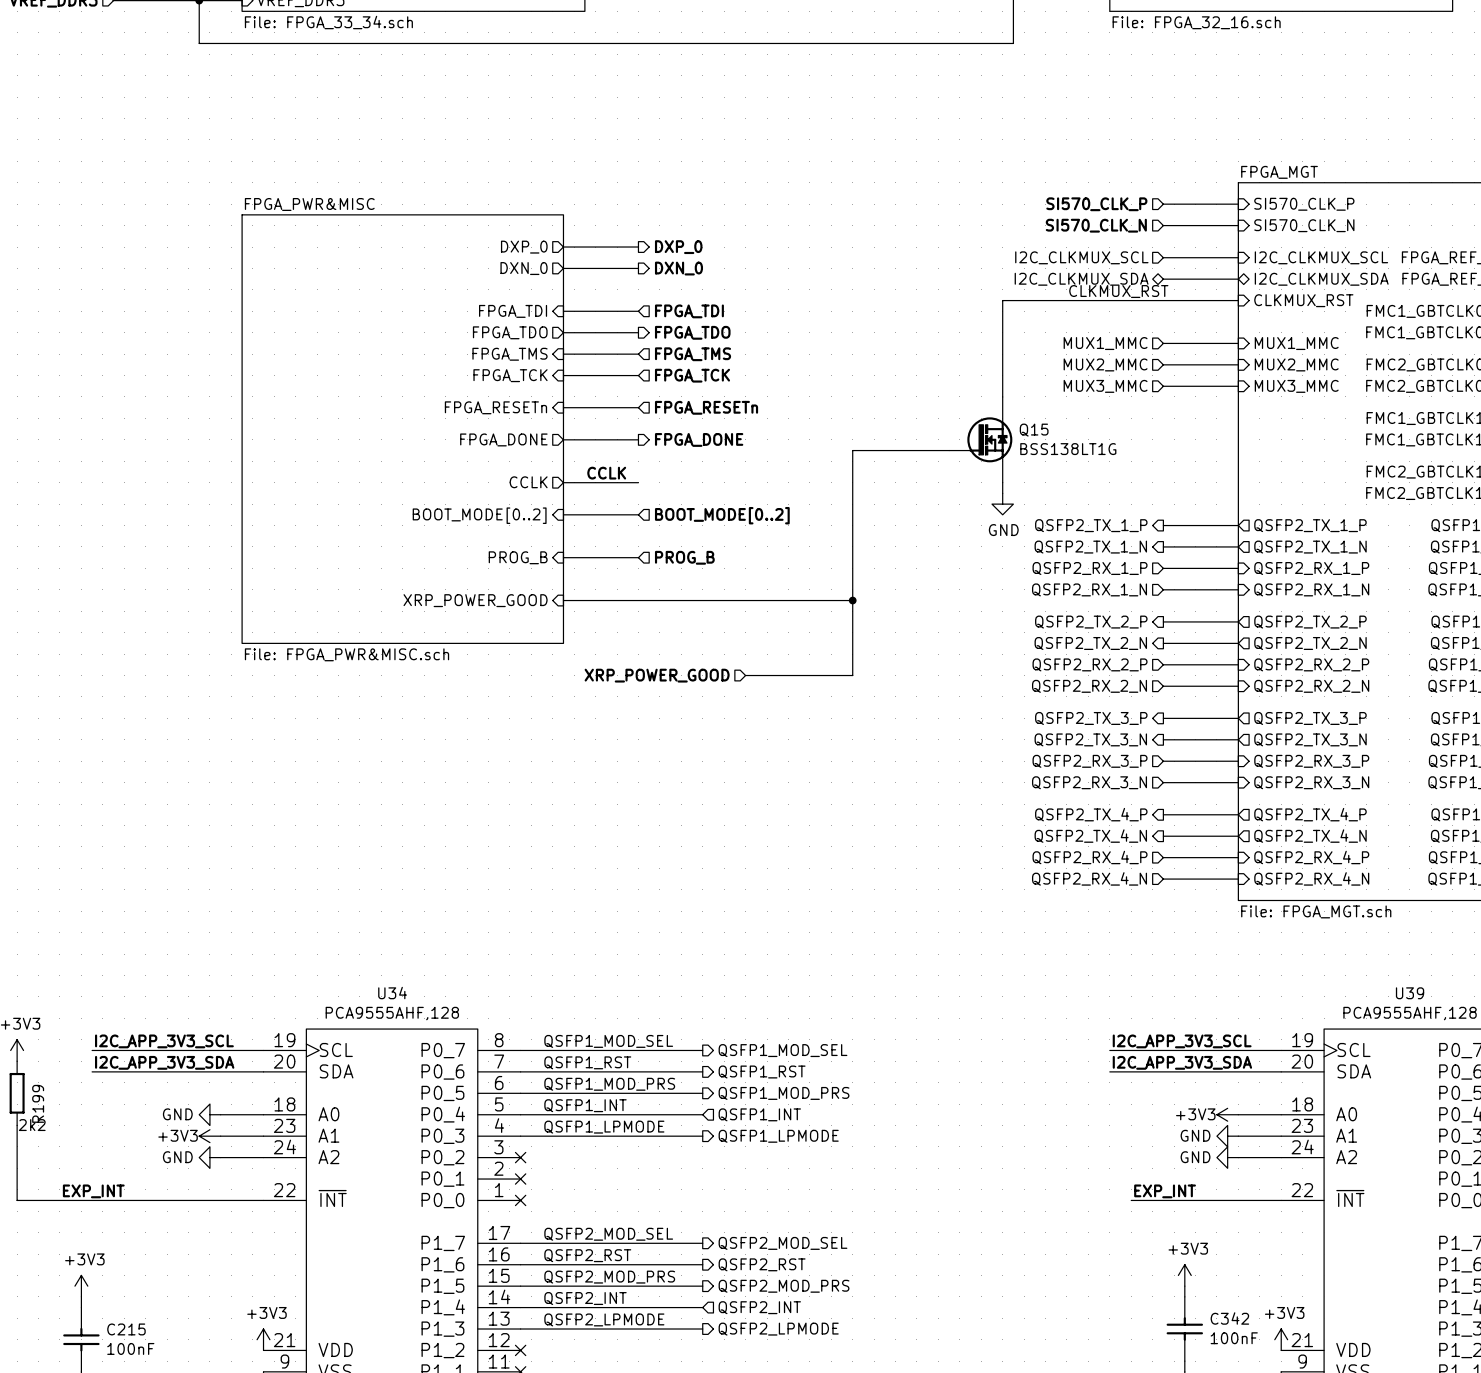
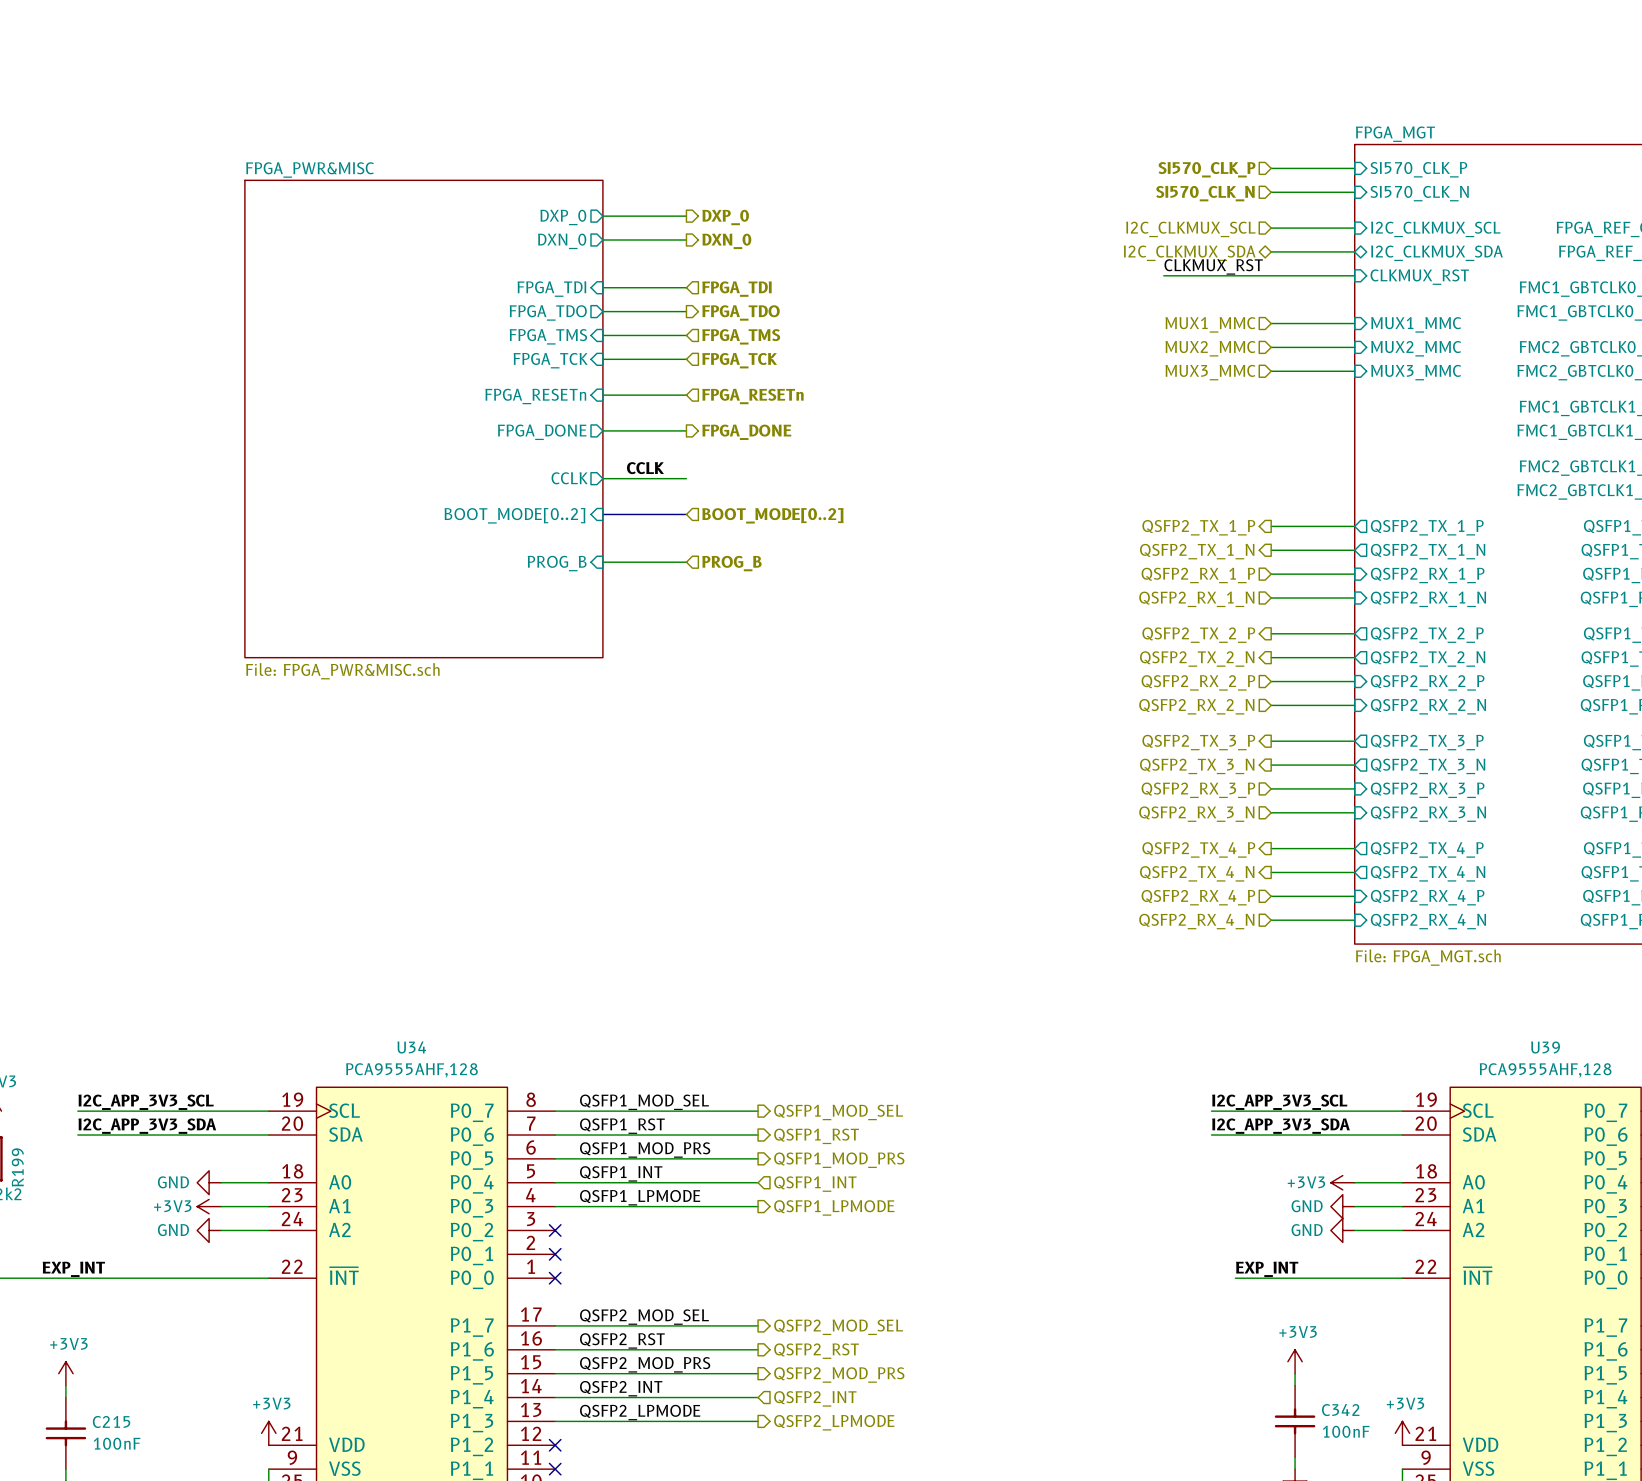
wire: (1066, 300) (1002, 300) (1002, 396) -> none
Q15: BSS138LT1G (980, 439) -> none
wire: (949, 450) (852, 450) (852, 675) (745, 675) -> none
wire: (1002, 482) (1002, 493) -> none
power symbol: GND (1002, 504) -> none
sheet pin: XRP_POWER_GOOD (475, 600) -> none
wire: (563, 600) (852, 600) -> none
junction: (852, 600) -> none
hierarchical label: XRP_POWER_GOOD (657, 675) -> none

